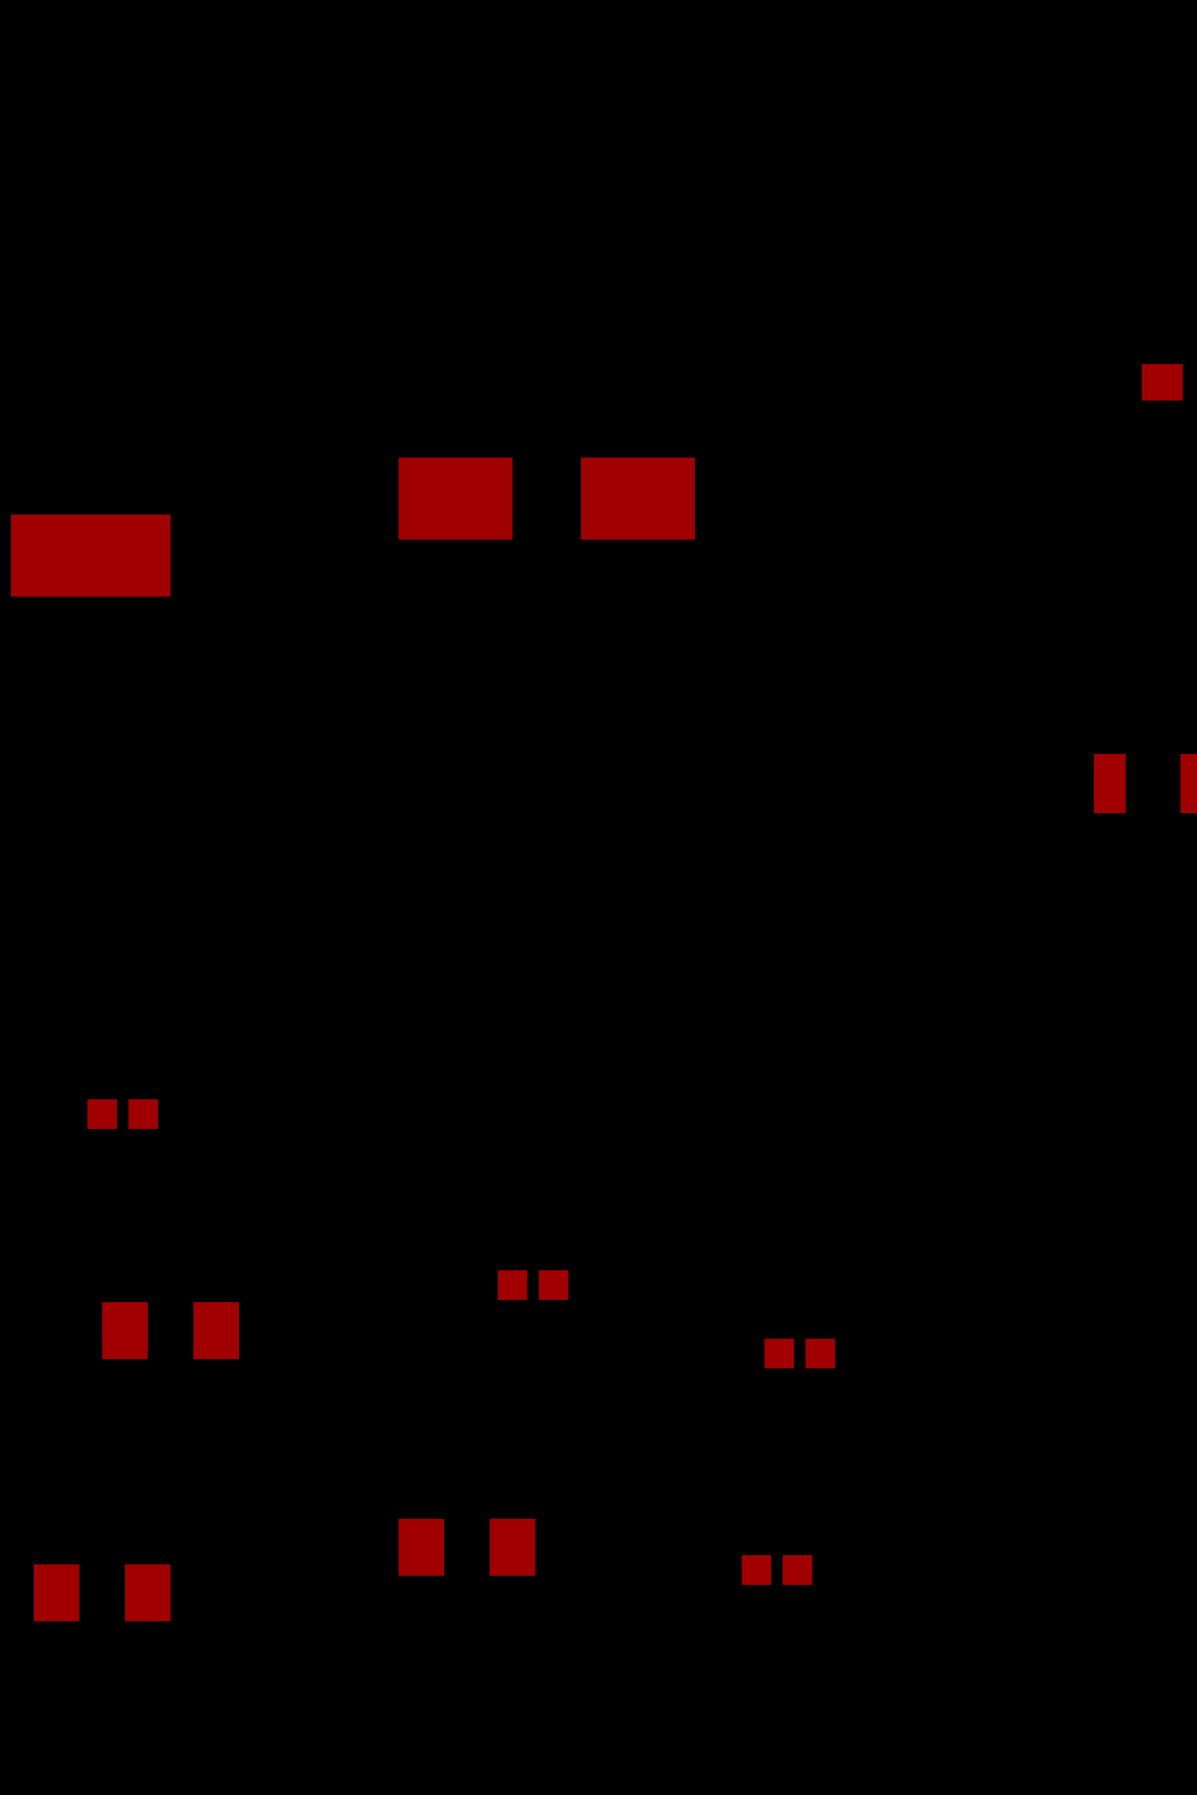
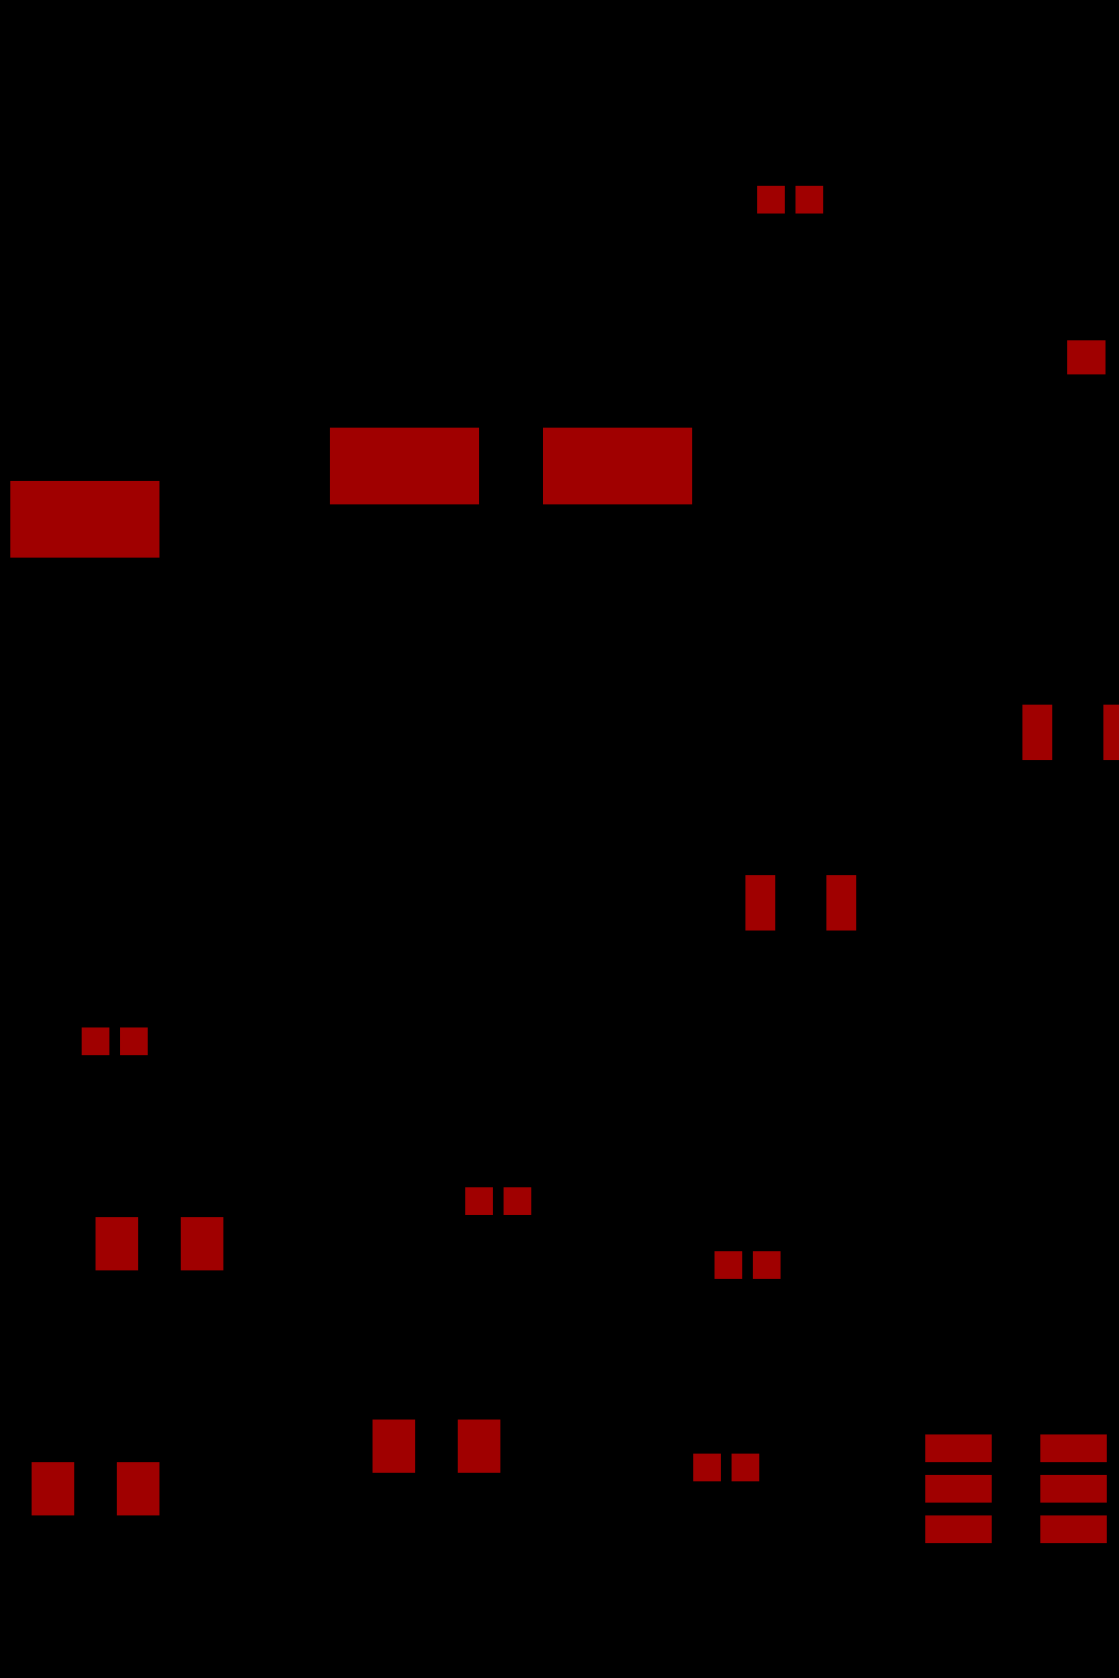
part: none -> (790, 199)
part footprint: [398, 457, 695, 540] -> [329, 427, 693, 505]
part: none -> (800, 902)
part: none -> (1016, 1488)

